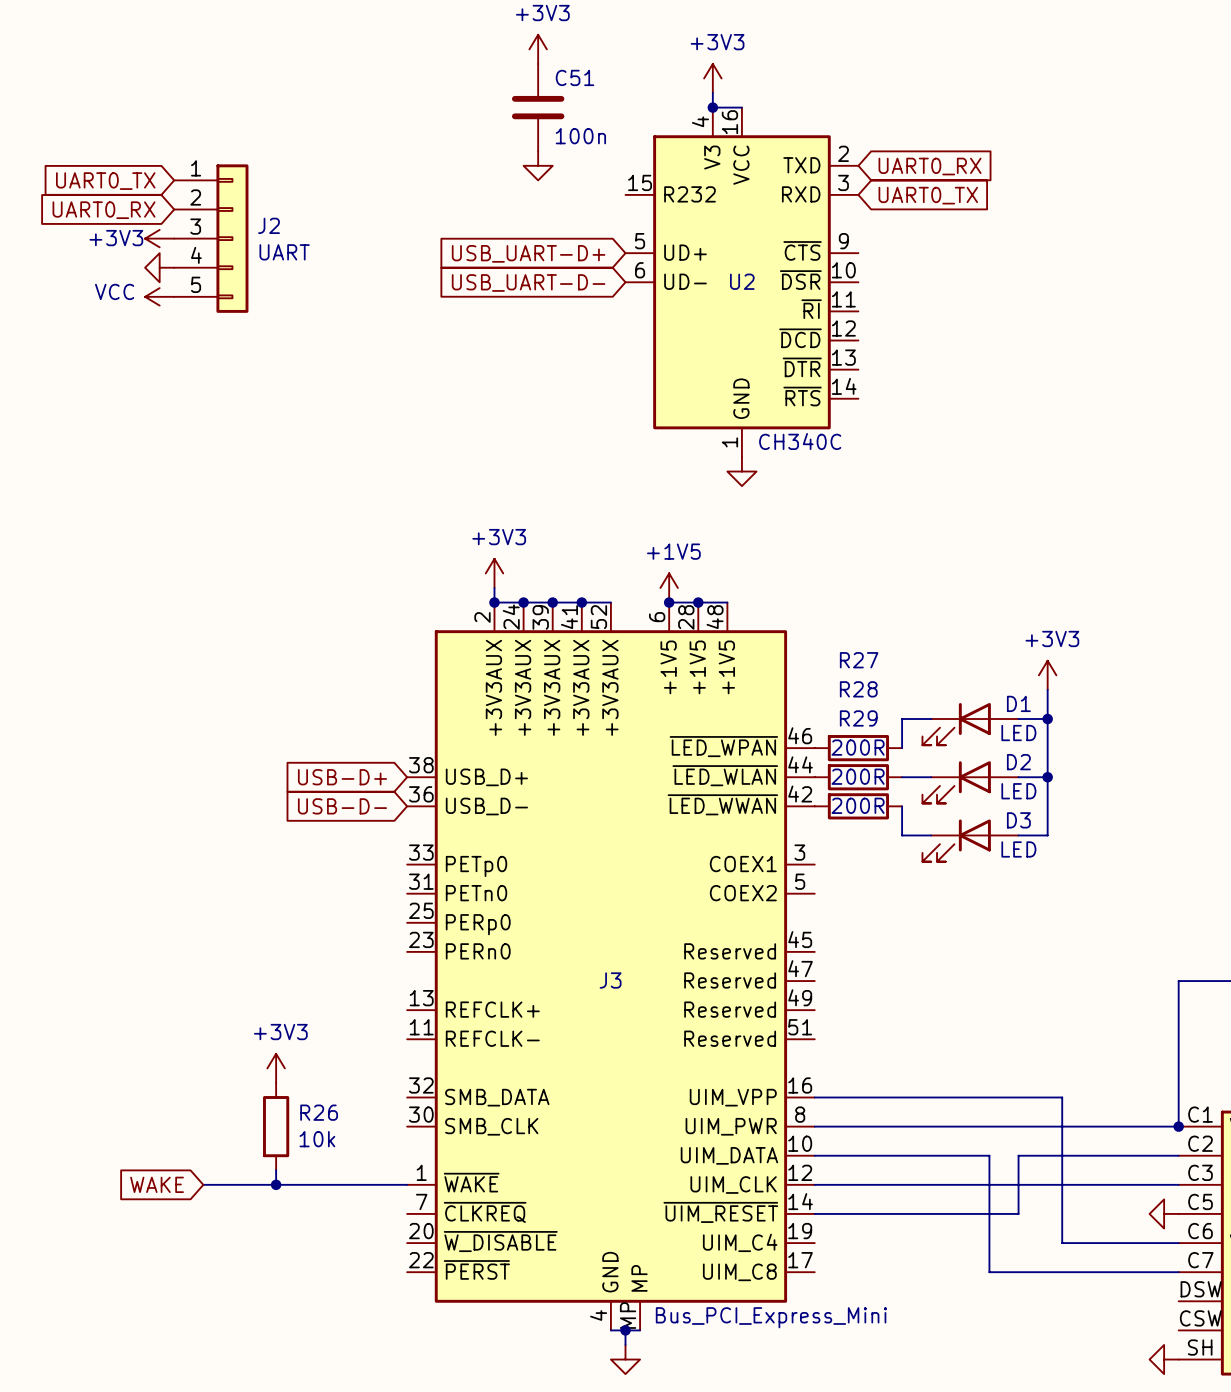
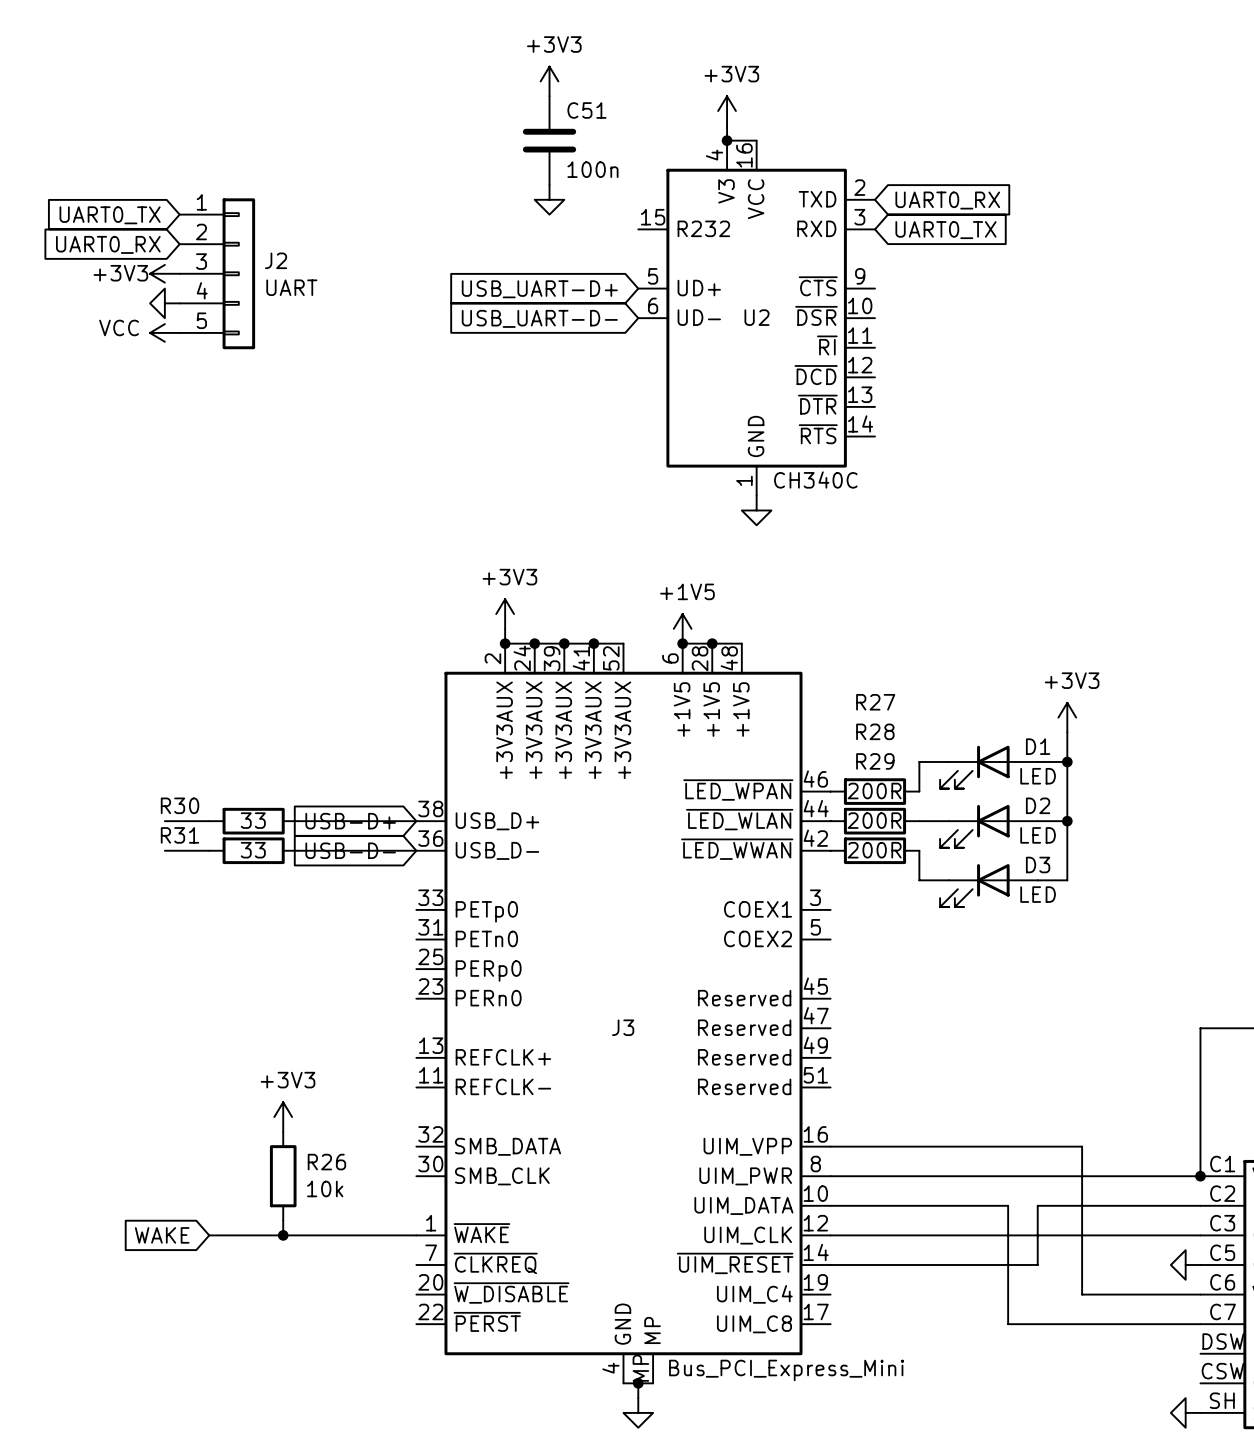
wire: none -> (164, 821) (209, 821)
R30: none -> 33 (253, 821)
wire: none -> (298, 821) (416, 821)
wire: none -> (164, 850) (209, 850)
R31: none -> 33 (253, 850)
wire: none -> (298, 850) (416, 850)

